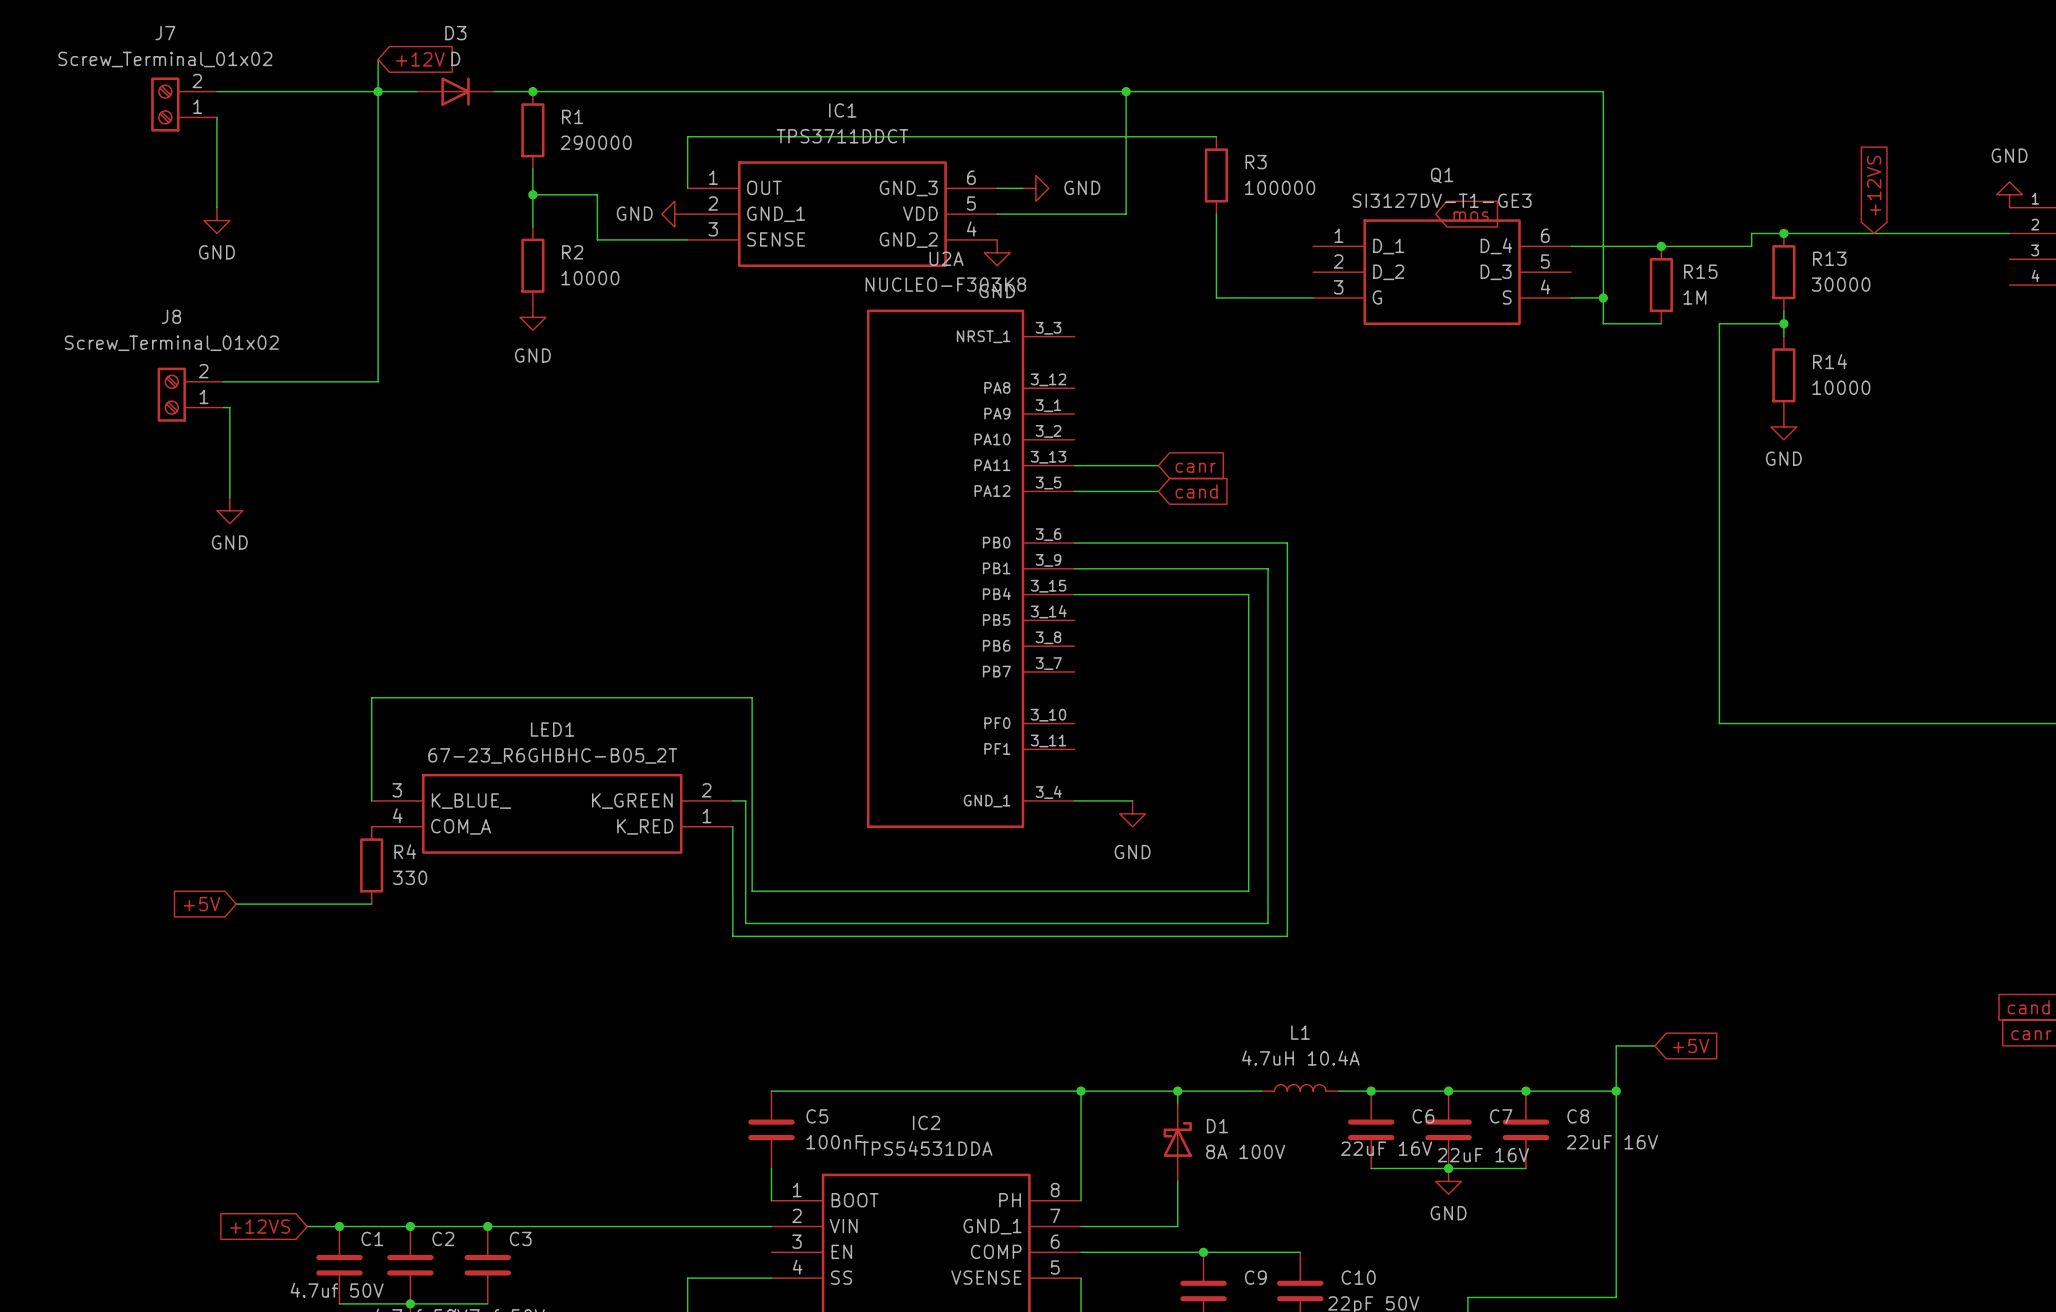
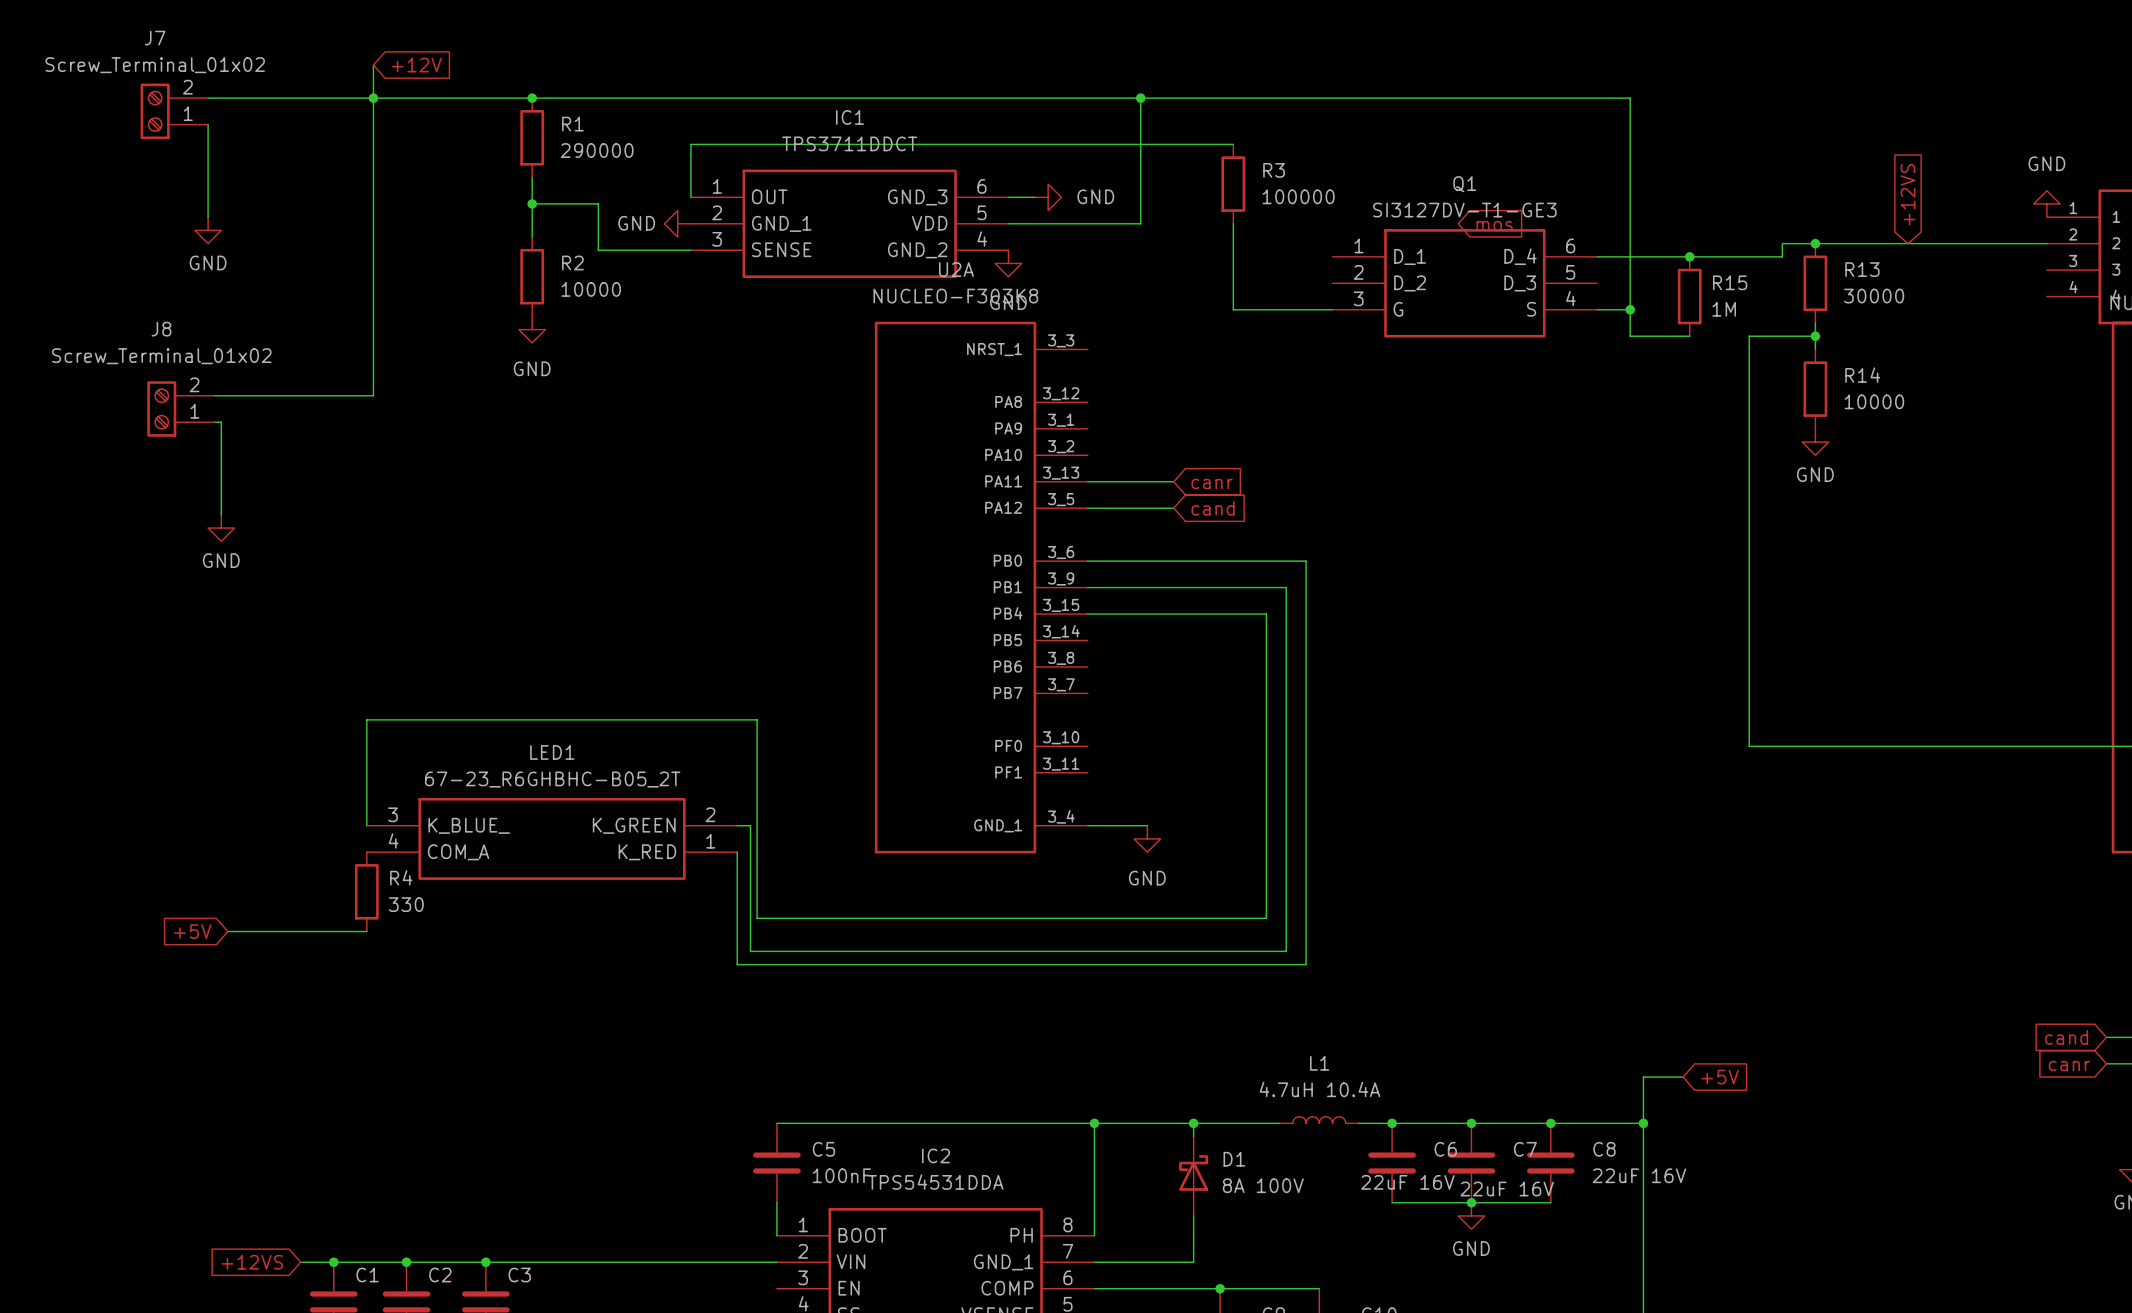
D3: D (455, 91) -> none

